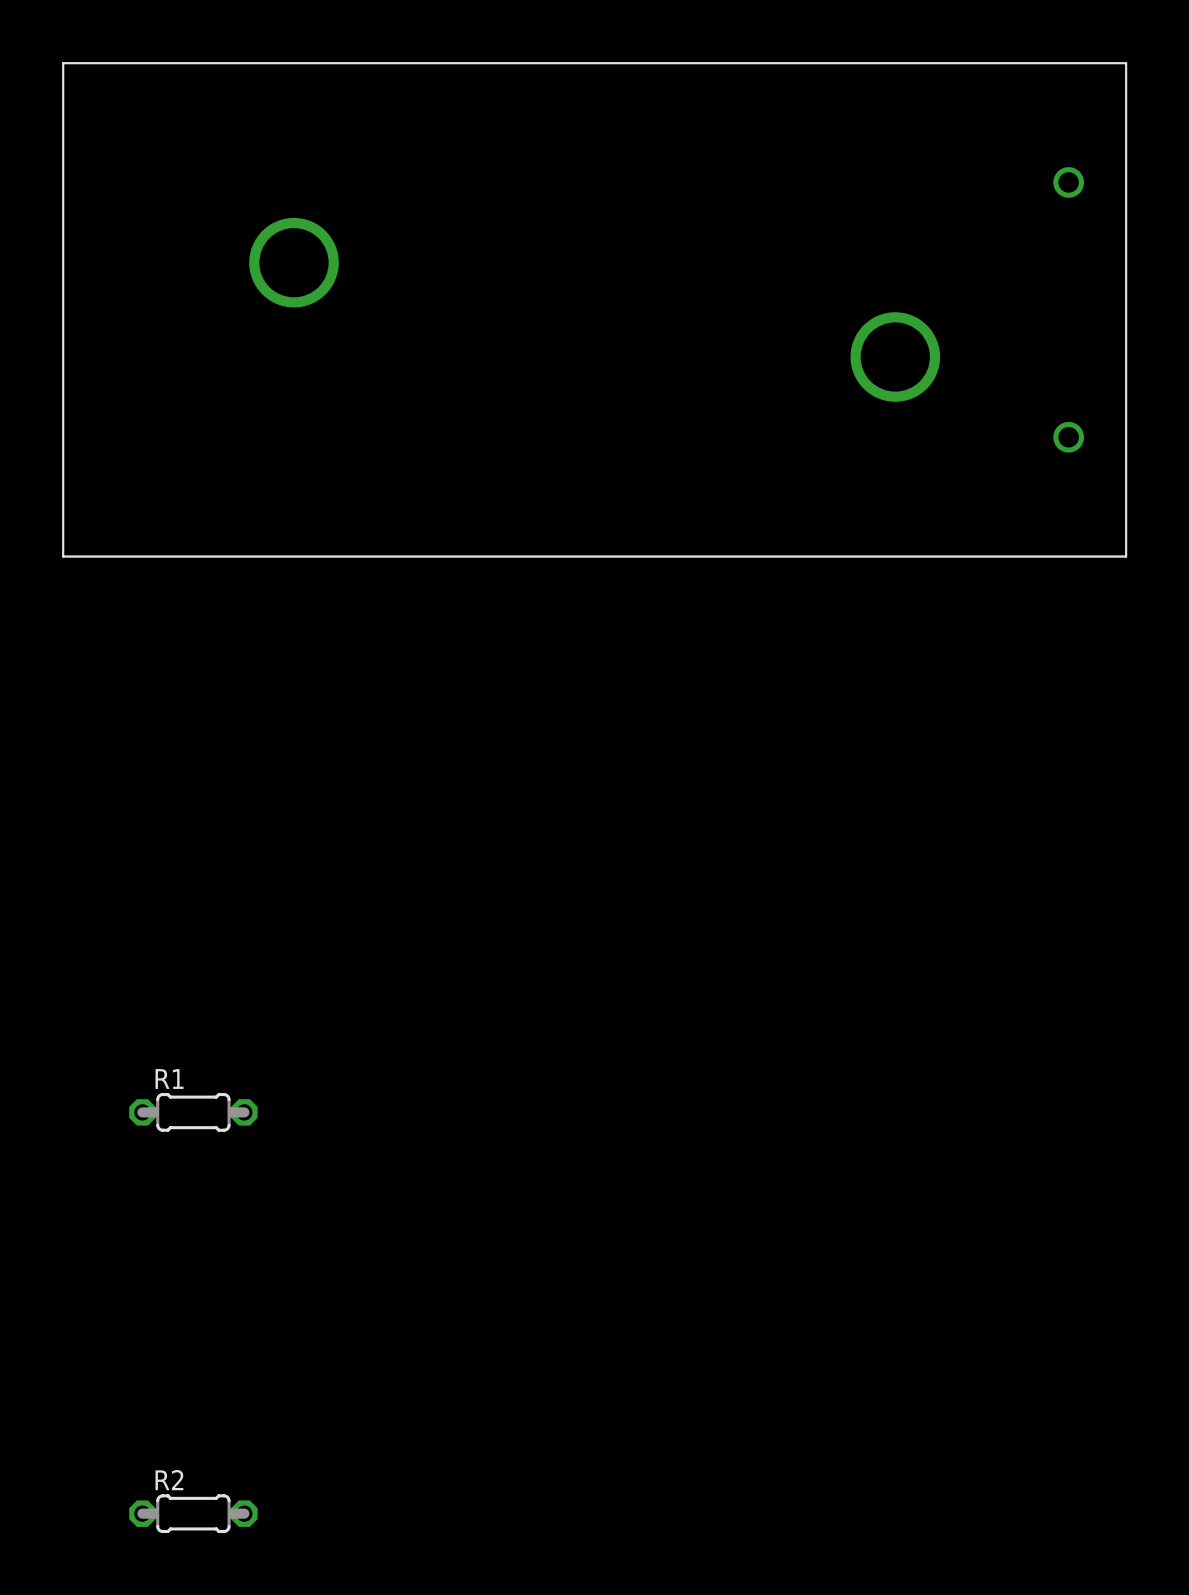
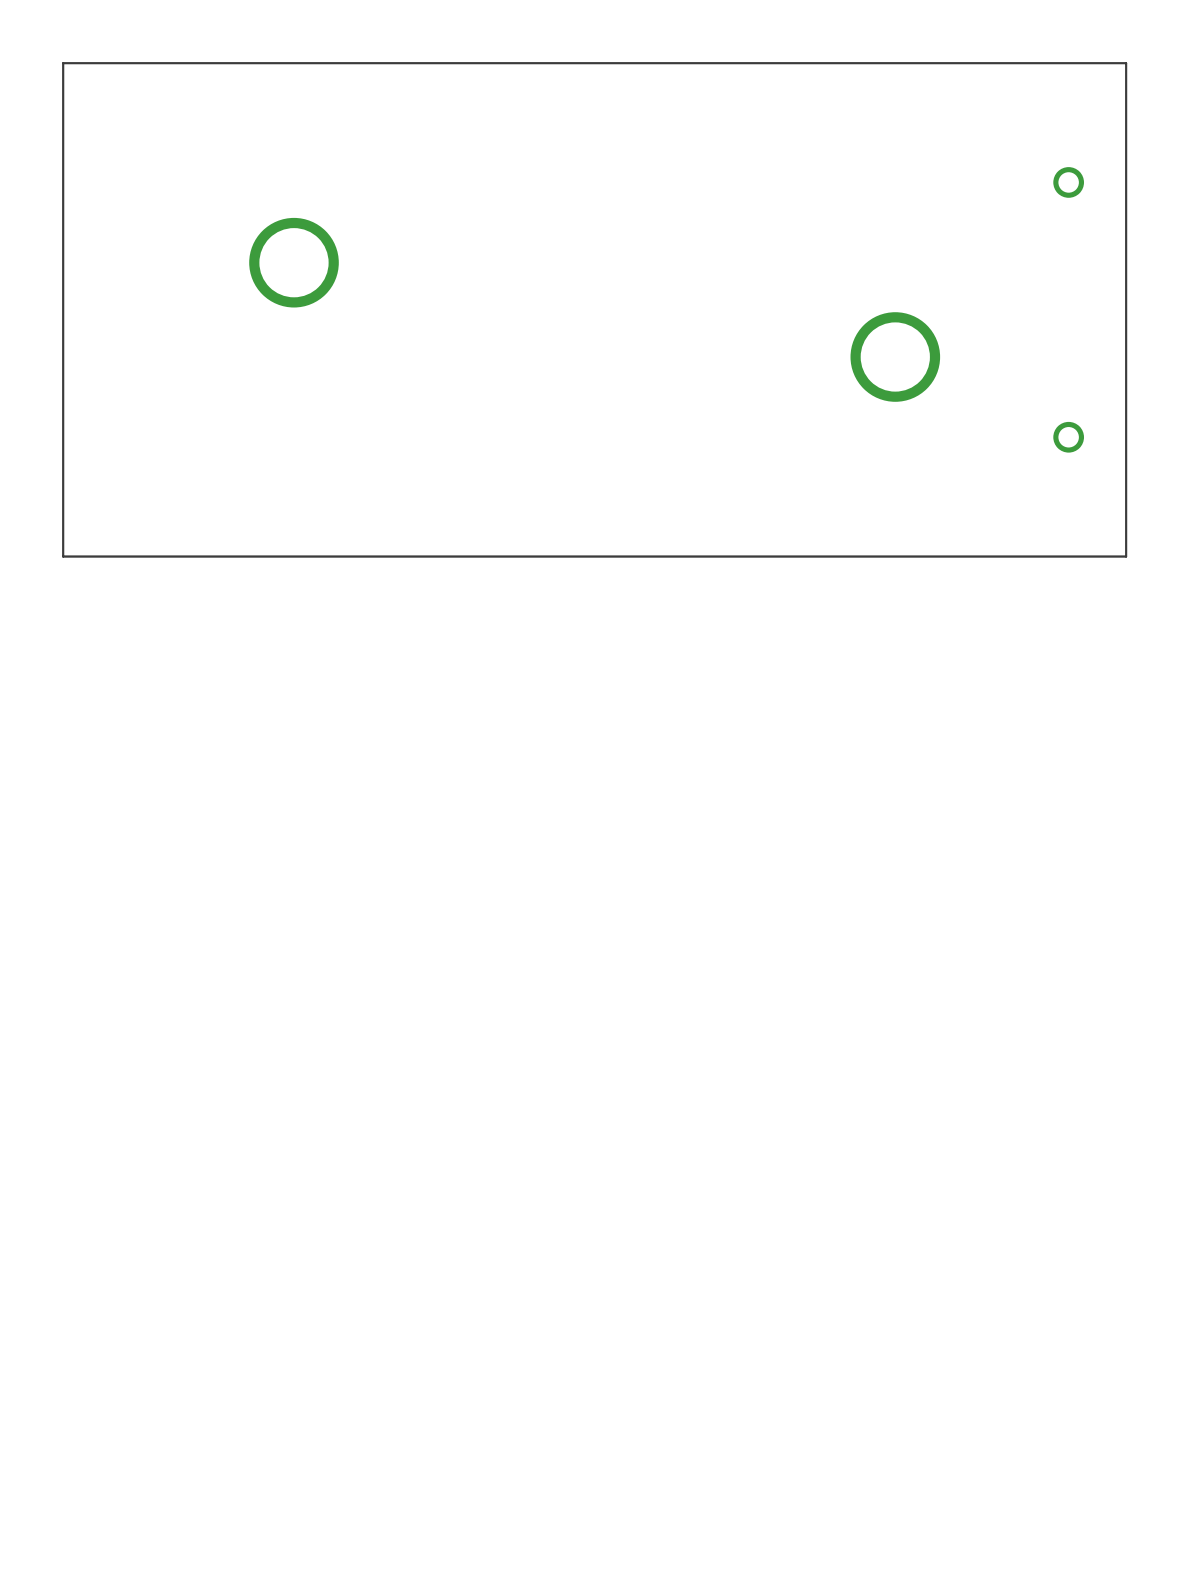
R1: (193, 1112) -> none
R2: (193, 1513) -> none

